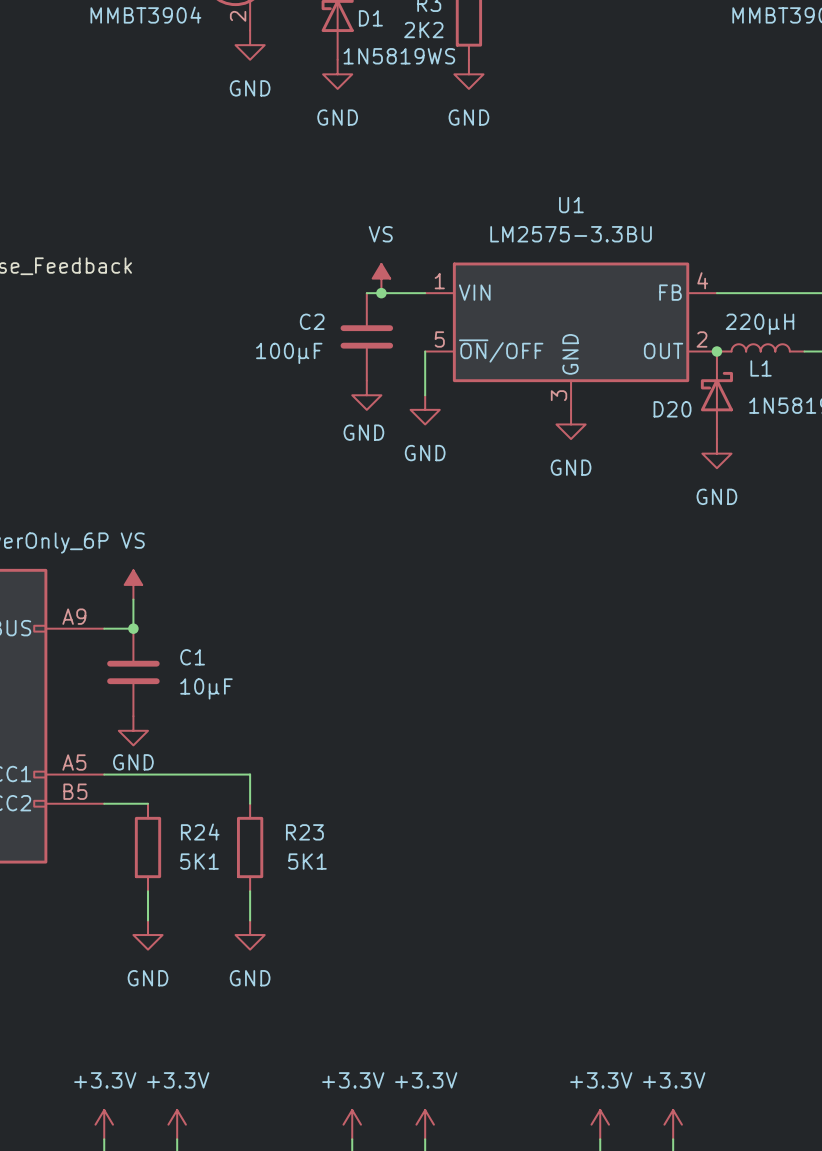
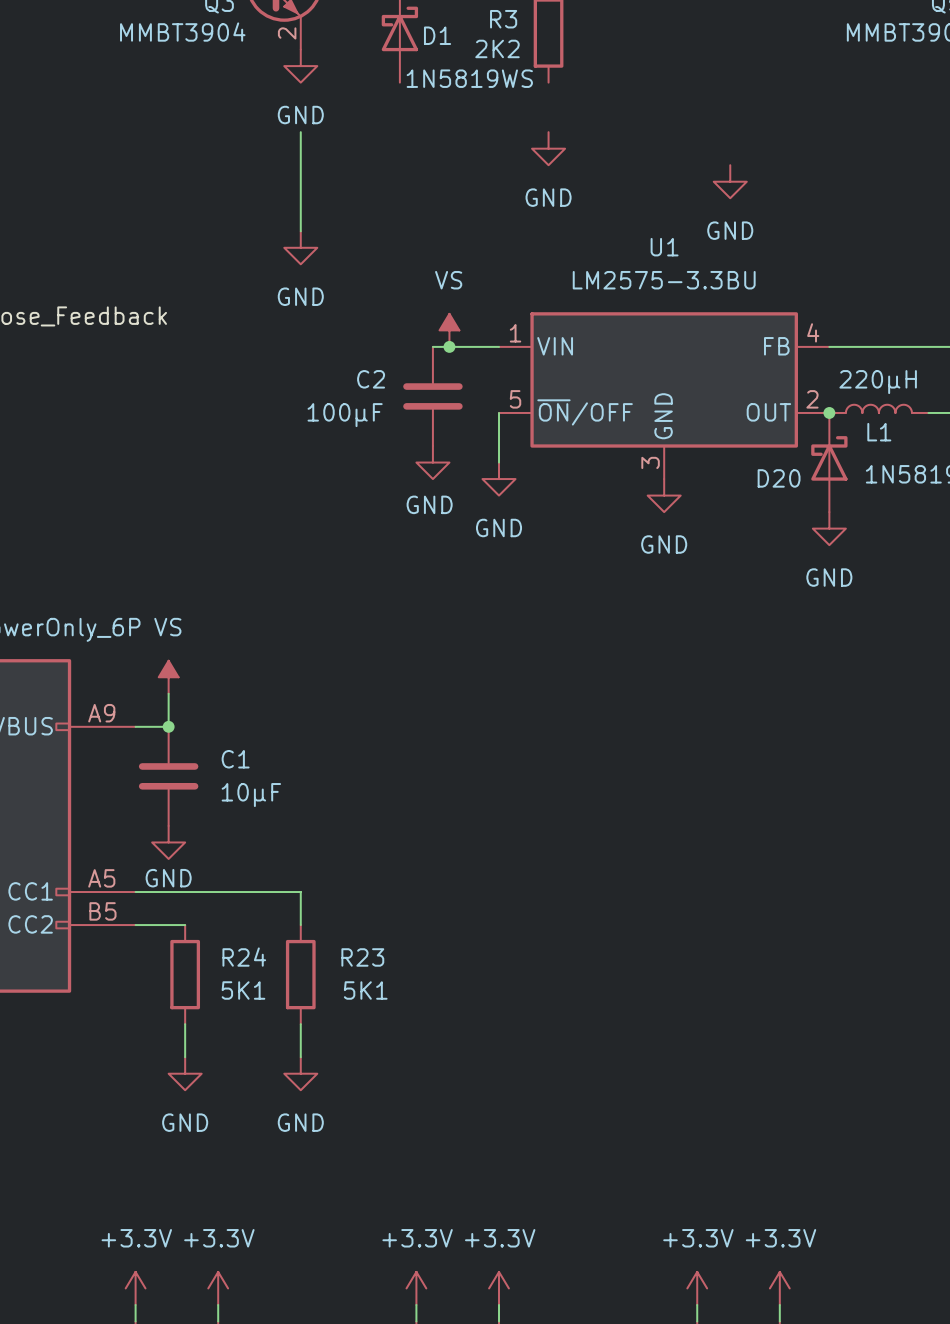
power symbol: GND (337, 74) -> none
power symbol position: GND (468, 74) -> GND (548, 148)
wire: none -> (300, 132) (300, 231)
power symbol: none -> GND (730, 181)
power symbol: none -> GND (300, 247)

